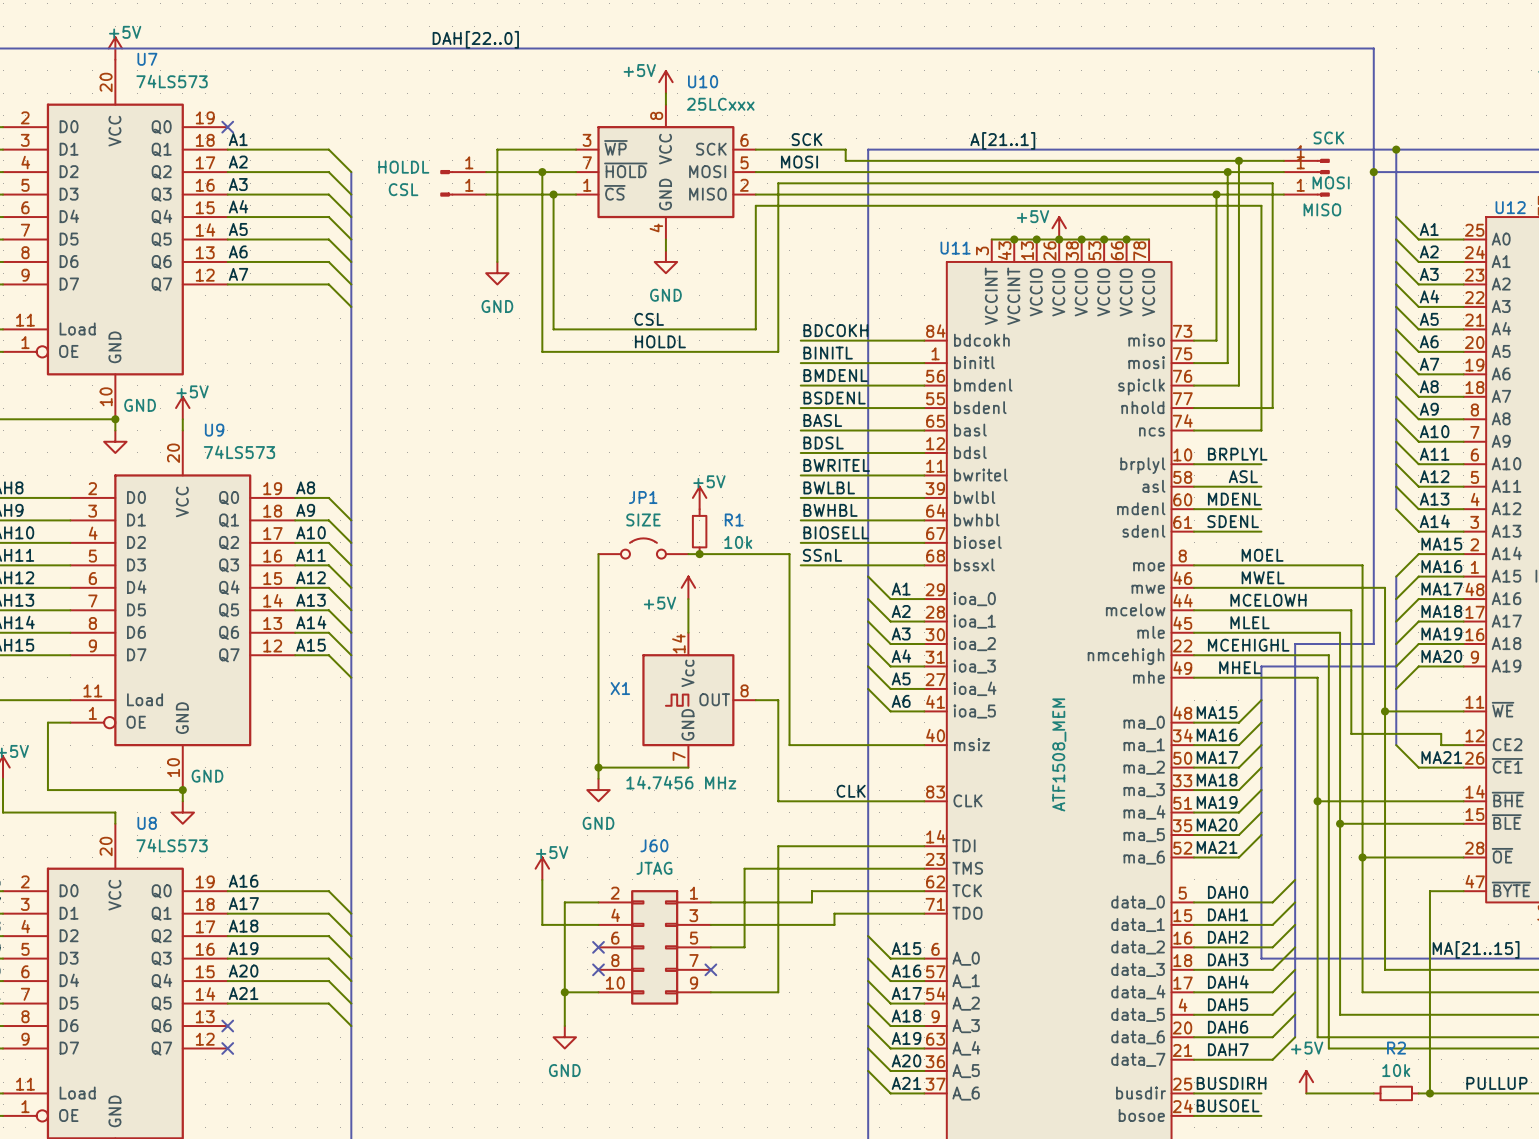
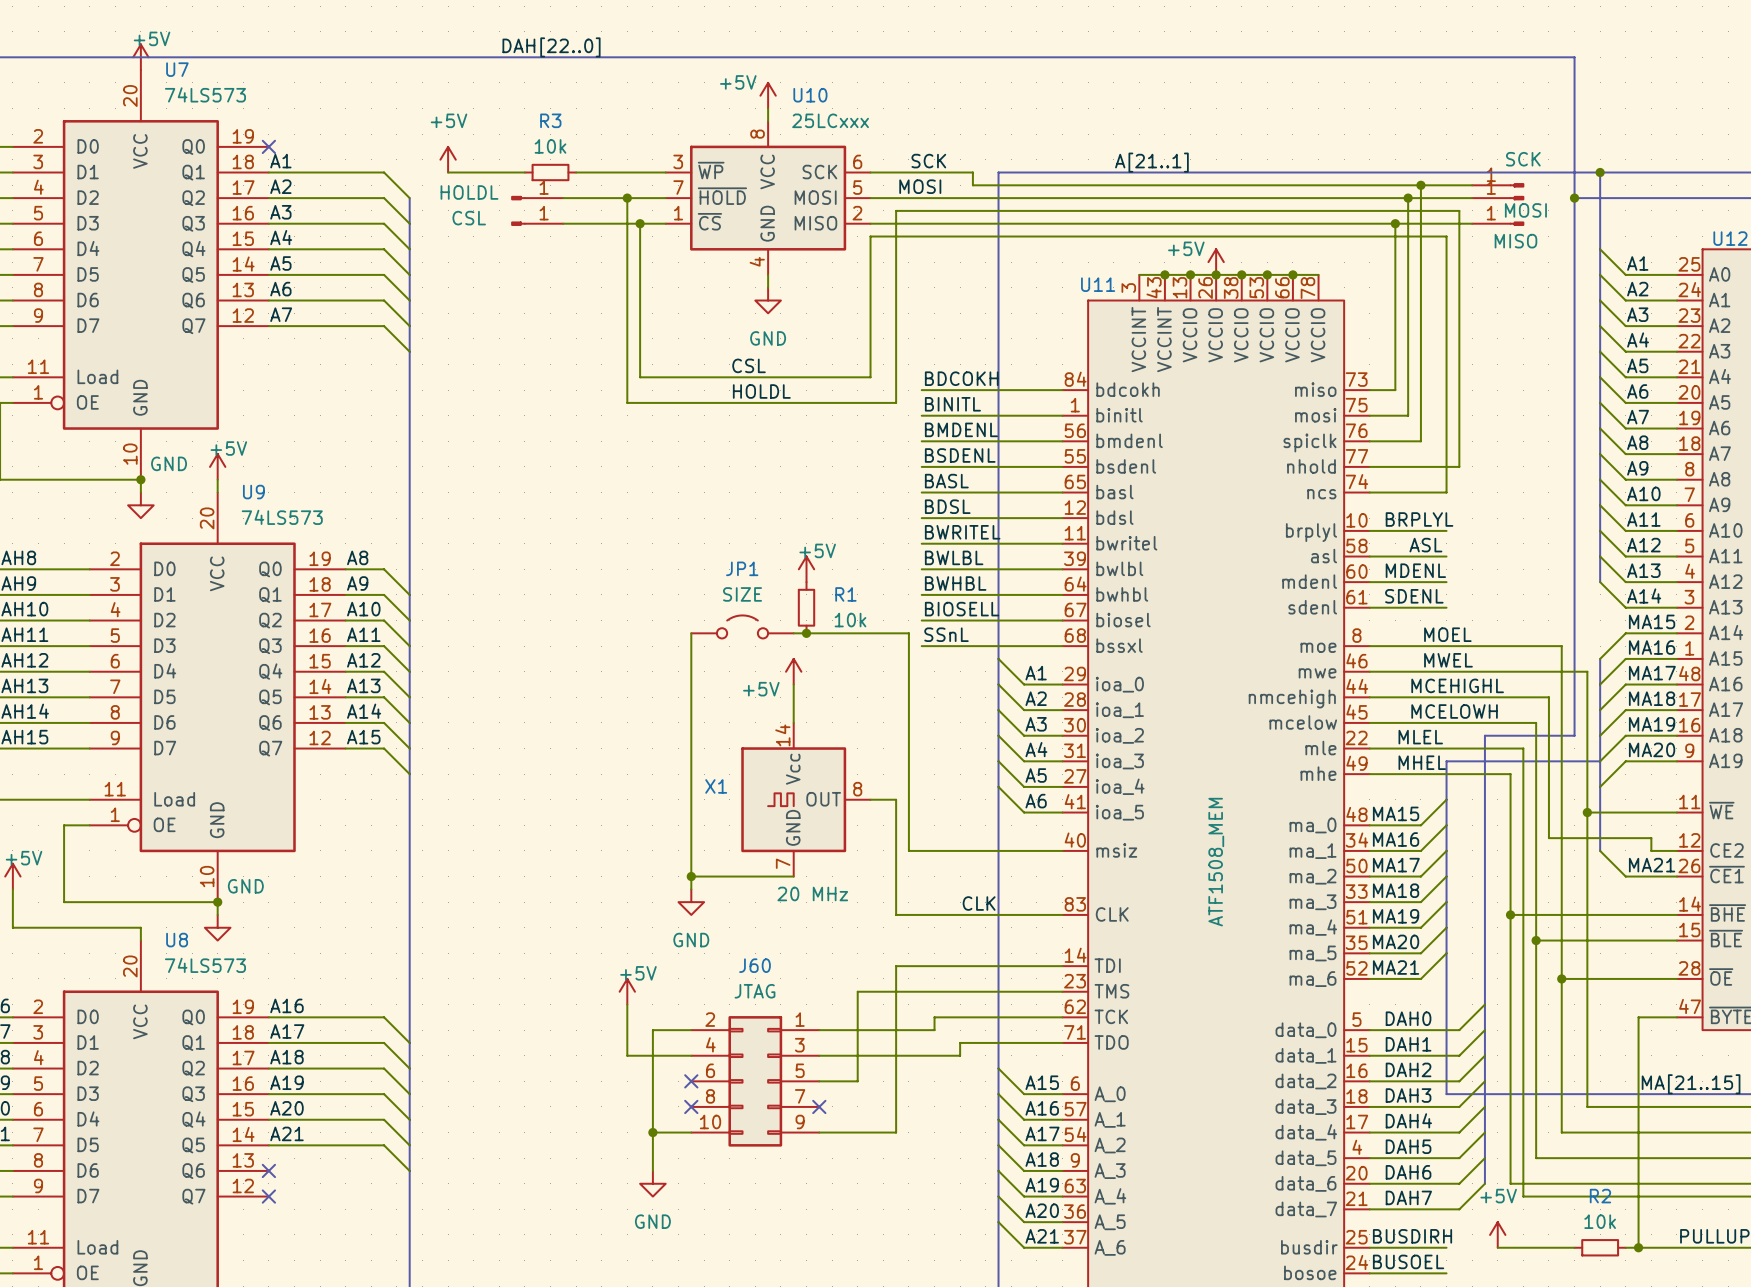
power symbol: none -> +5V (448, 159)
wire: none -> (448, 172) (524, 172)
R3: none -> 10k (550, 172)
wire: (497, 149) (497, 261) -> none
power symbol: GND (497, 273) -> none
label: MCELOWH (1268, 600) -> MCEHIGHL (1457, 685)
U11 pin name: mcelow (1135, 609) -> nmcehigh (1292, 698)
label: MLEL (1250, 622) -> MCELOWH (1454, 711)
U11 pin name: mle (1151, 632) -> mcelow (1303, 722)
label: none -> MLEL (1420, 737)
label: MCEHIGHL (1248, 645) -> none
U11 pin name: nmcehigh (1126, 656) -> mle (1320, 748)
X1 value: 14.7456 MHz (681, 782) -> 20 MHz (812, 893)

